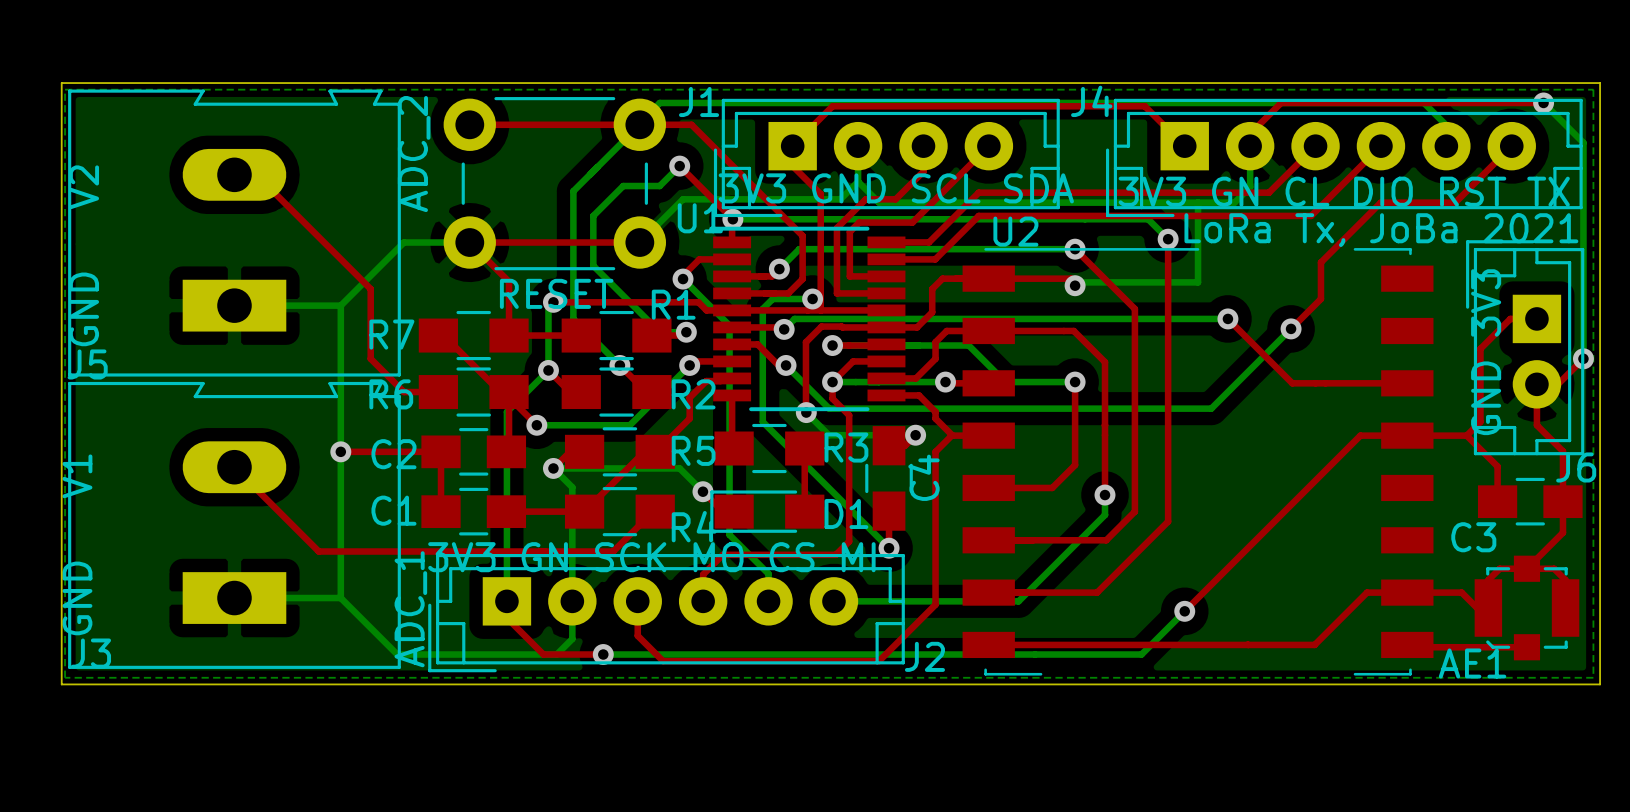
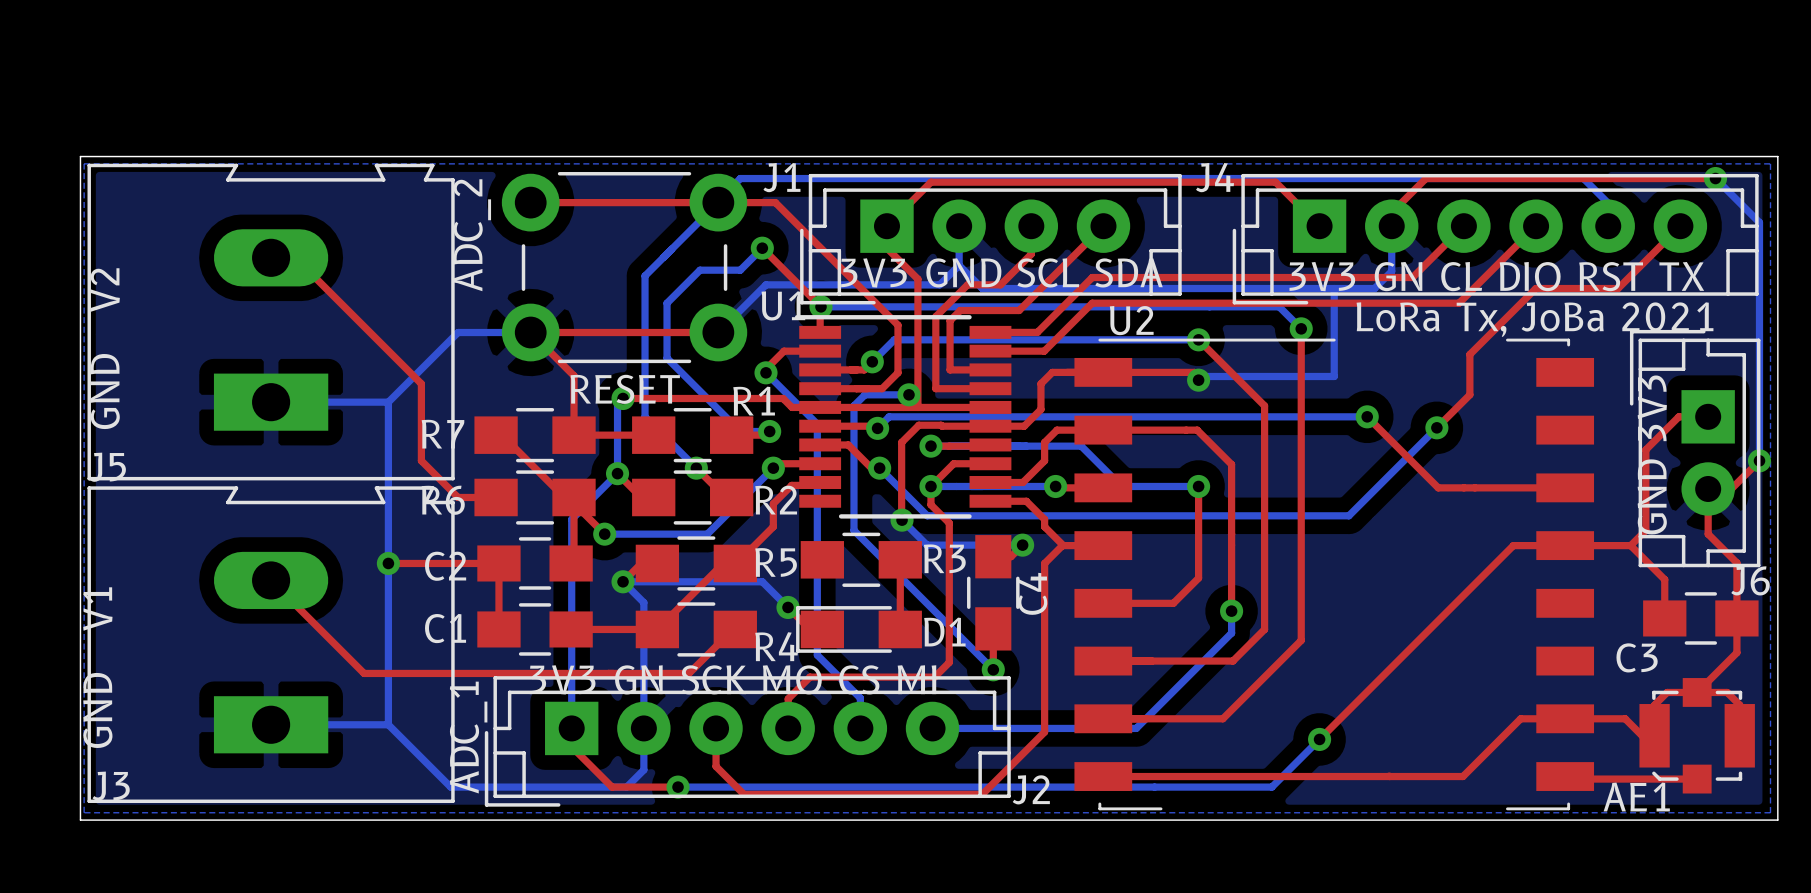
top track: (732, 395) (732, 446) (734, 448) -> none

